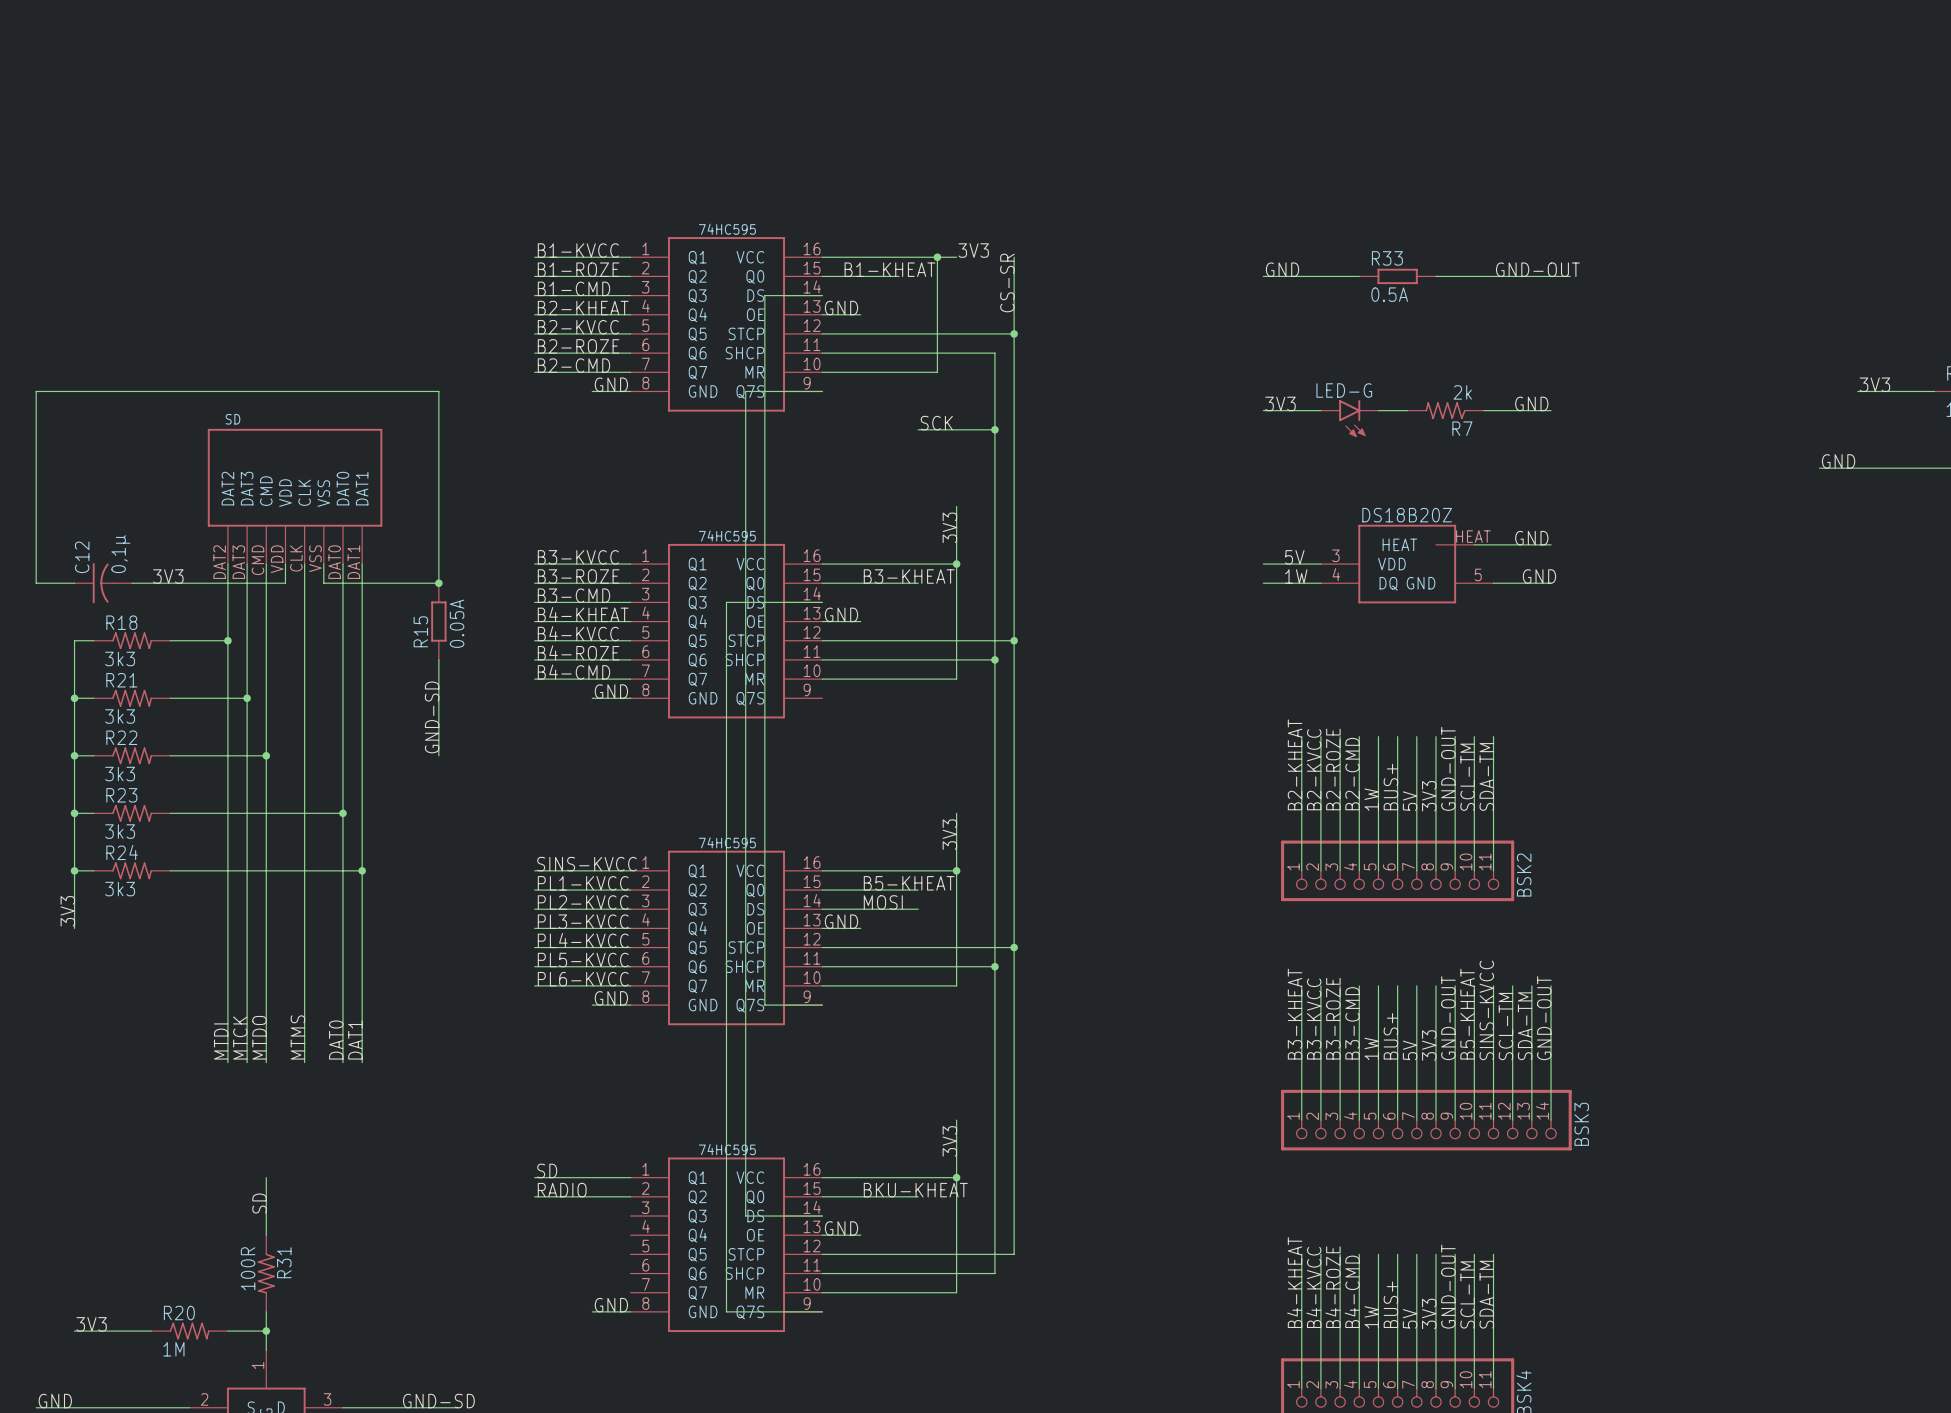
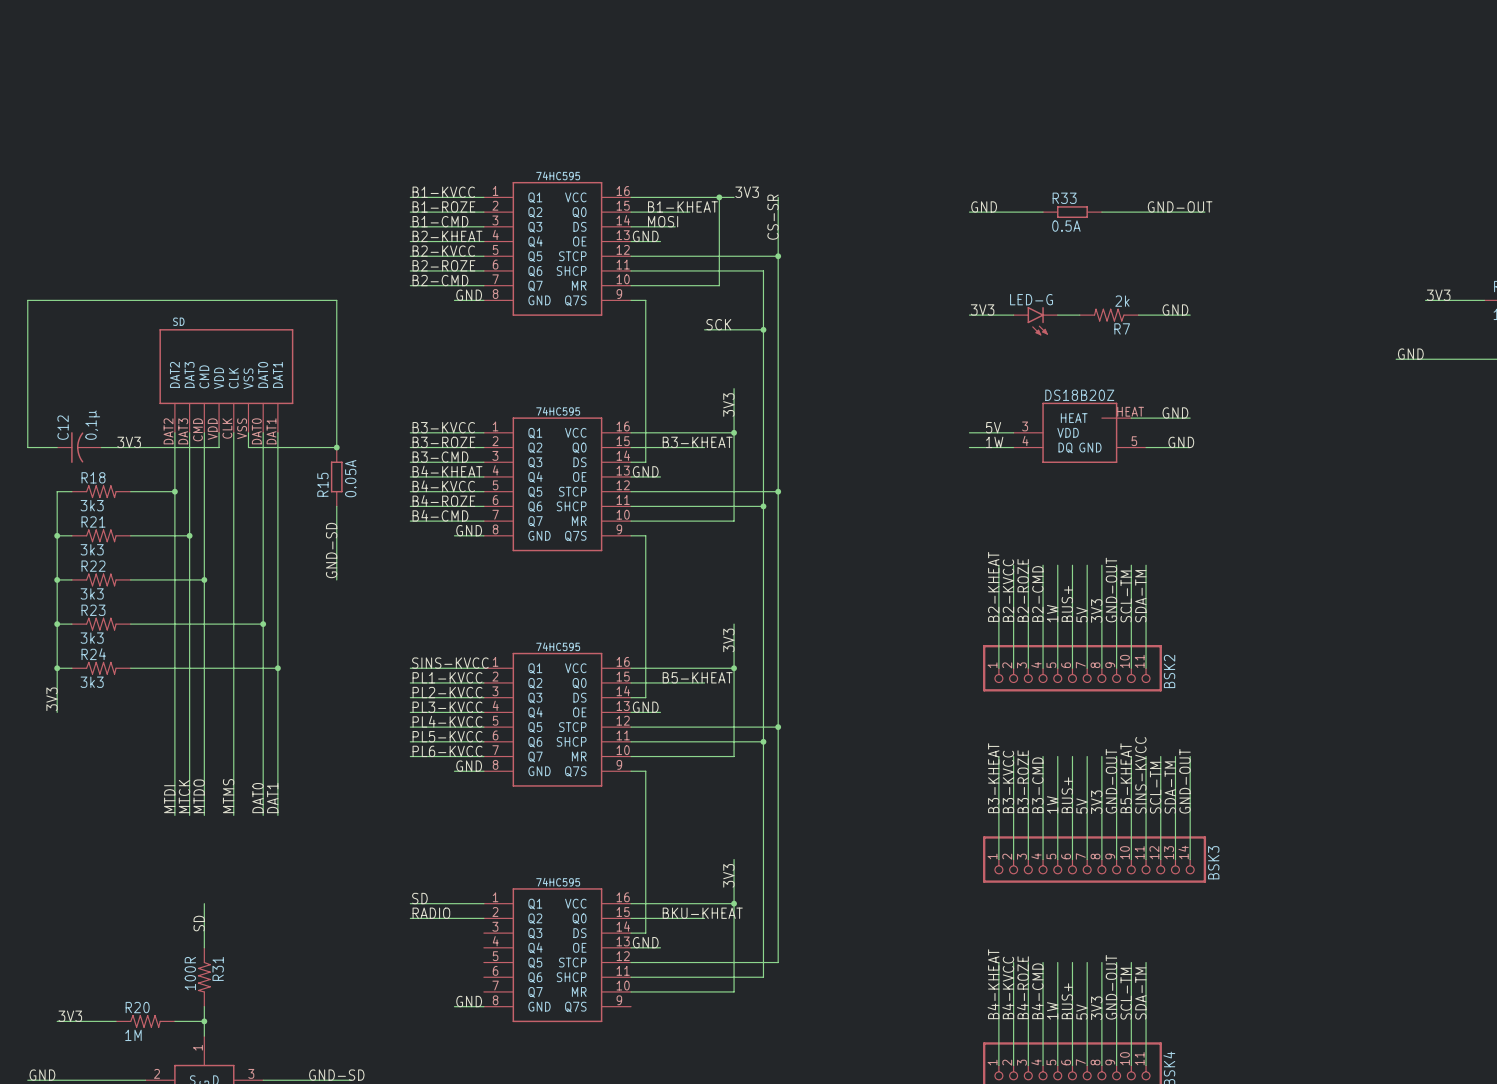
label: none -> MOSI (663, 221)
wire: (822, 295) (764, 295) (764, 1005) (822, 1005) -> (631, 226) (675, 226)
wire: (822, 391) (745, 391) (745, 1216) (822, 1216) -> (631, 300) (645, 300) (645, 462) (631, 462)
wire: (822, 602) (726, 602) (726, 1311) (822, 1311) -> none
label: MOSI (883, 902) -> none
wire: (841, 909) (918, 909) -> (645, 697) (645, 535) (631, 535)
wire: none -> (631, 771) (645, 771) (645, 933) (631, 933)

